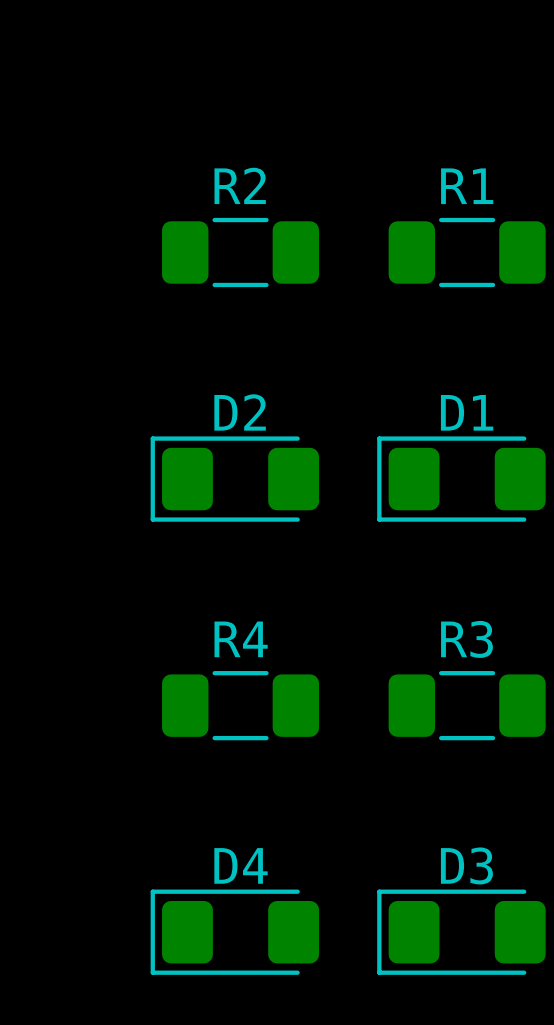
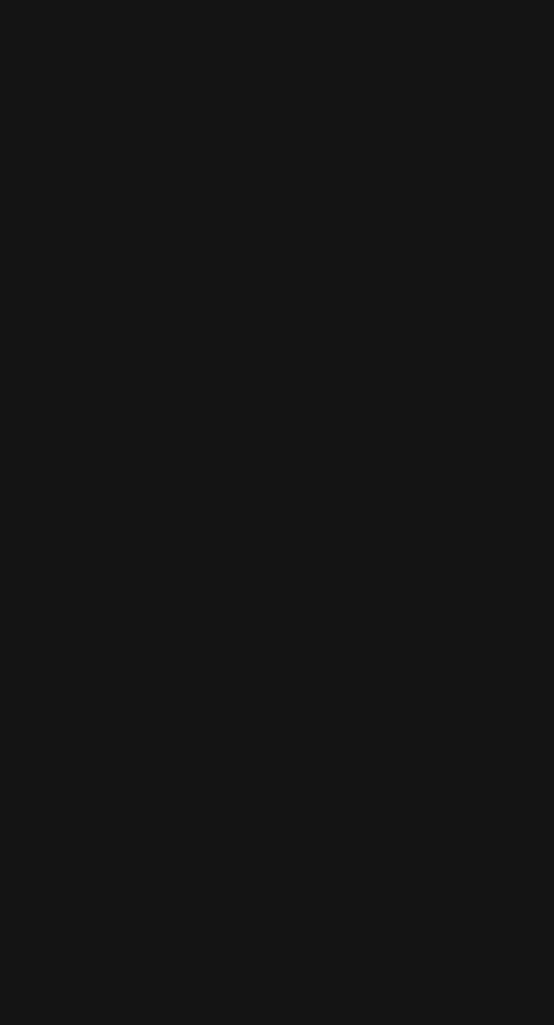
R2: (240, 252) -> none
R1: (467, 252) -> none
D2: (234, 479) -> none
D1: (461, 479) -> none
R4: (240, 705) -> none
R3: (467, 705) -> none
D4: (234, 932) -> none
D3: (461, 932) -> none

